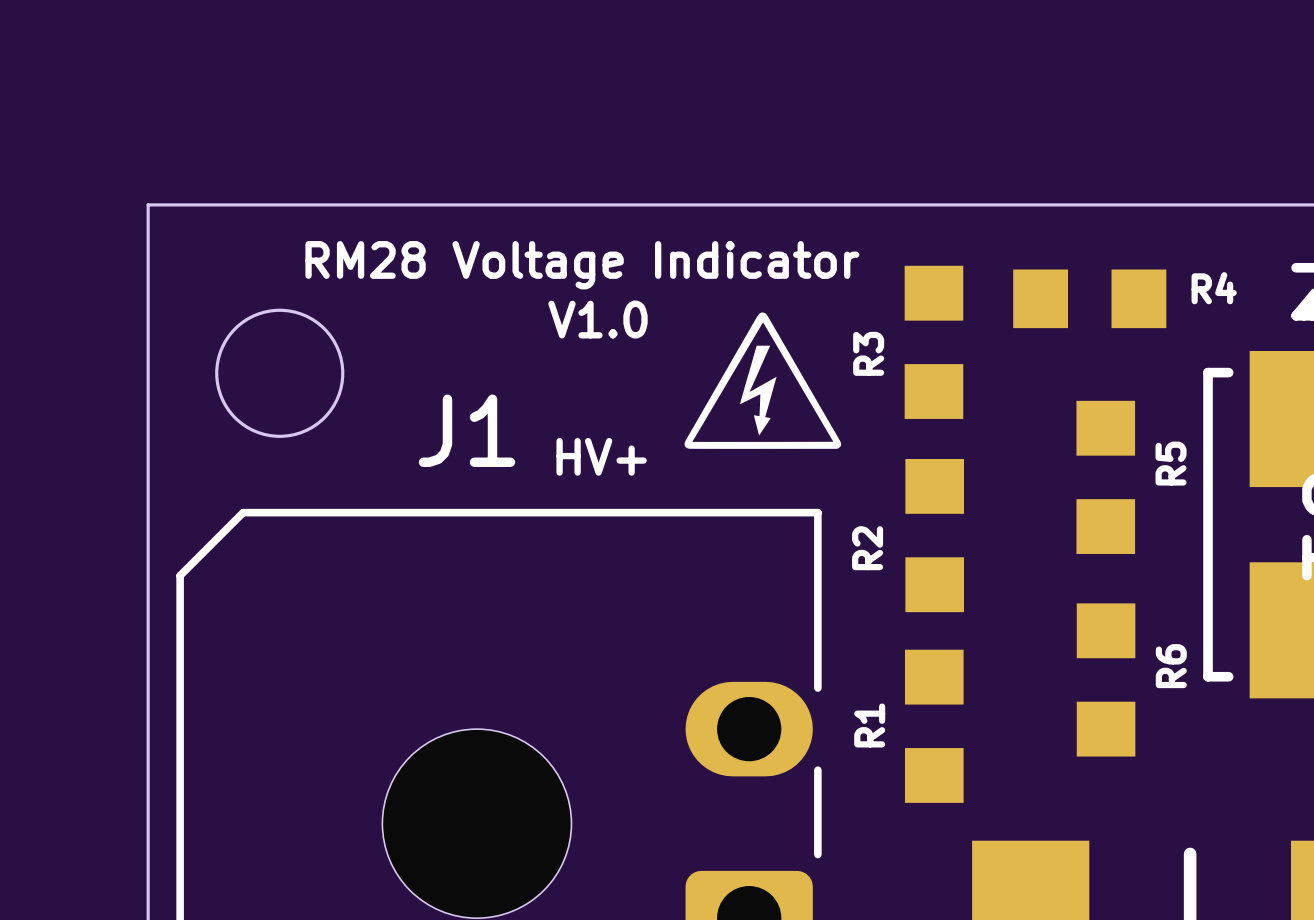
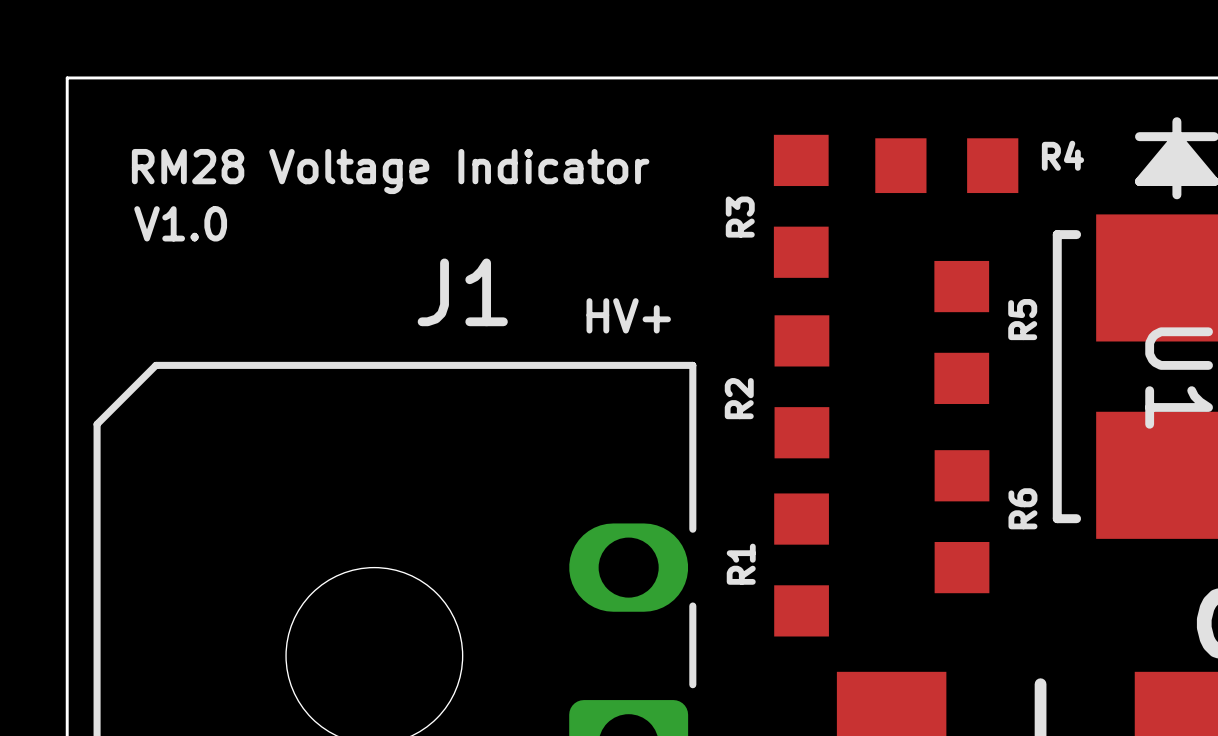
text position: RM28 Voltage Indicator (582, 265) -> RM28 Voltage Indicator (390, 171)
round board edge: [215, 308, 345, 438] -> none
drawing: [684, 312, 842, 449] -> none
text position: V1.0 (598, 319) -> V1.0 (180, 223)
J1 name position: J1 (466, 430) -> J1 (462, 292)
text position: HV+ (601, 456) -> HV+ (628, 315)

